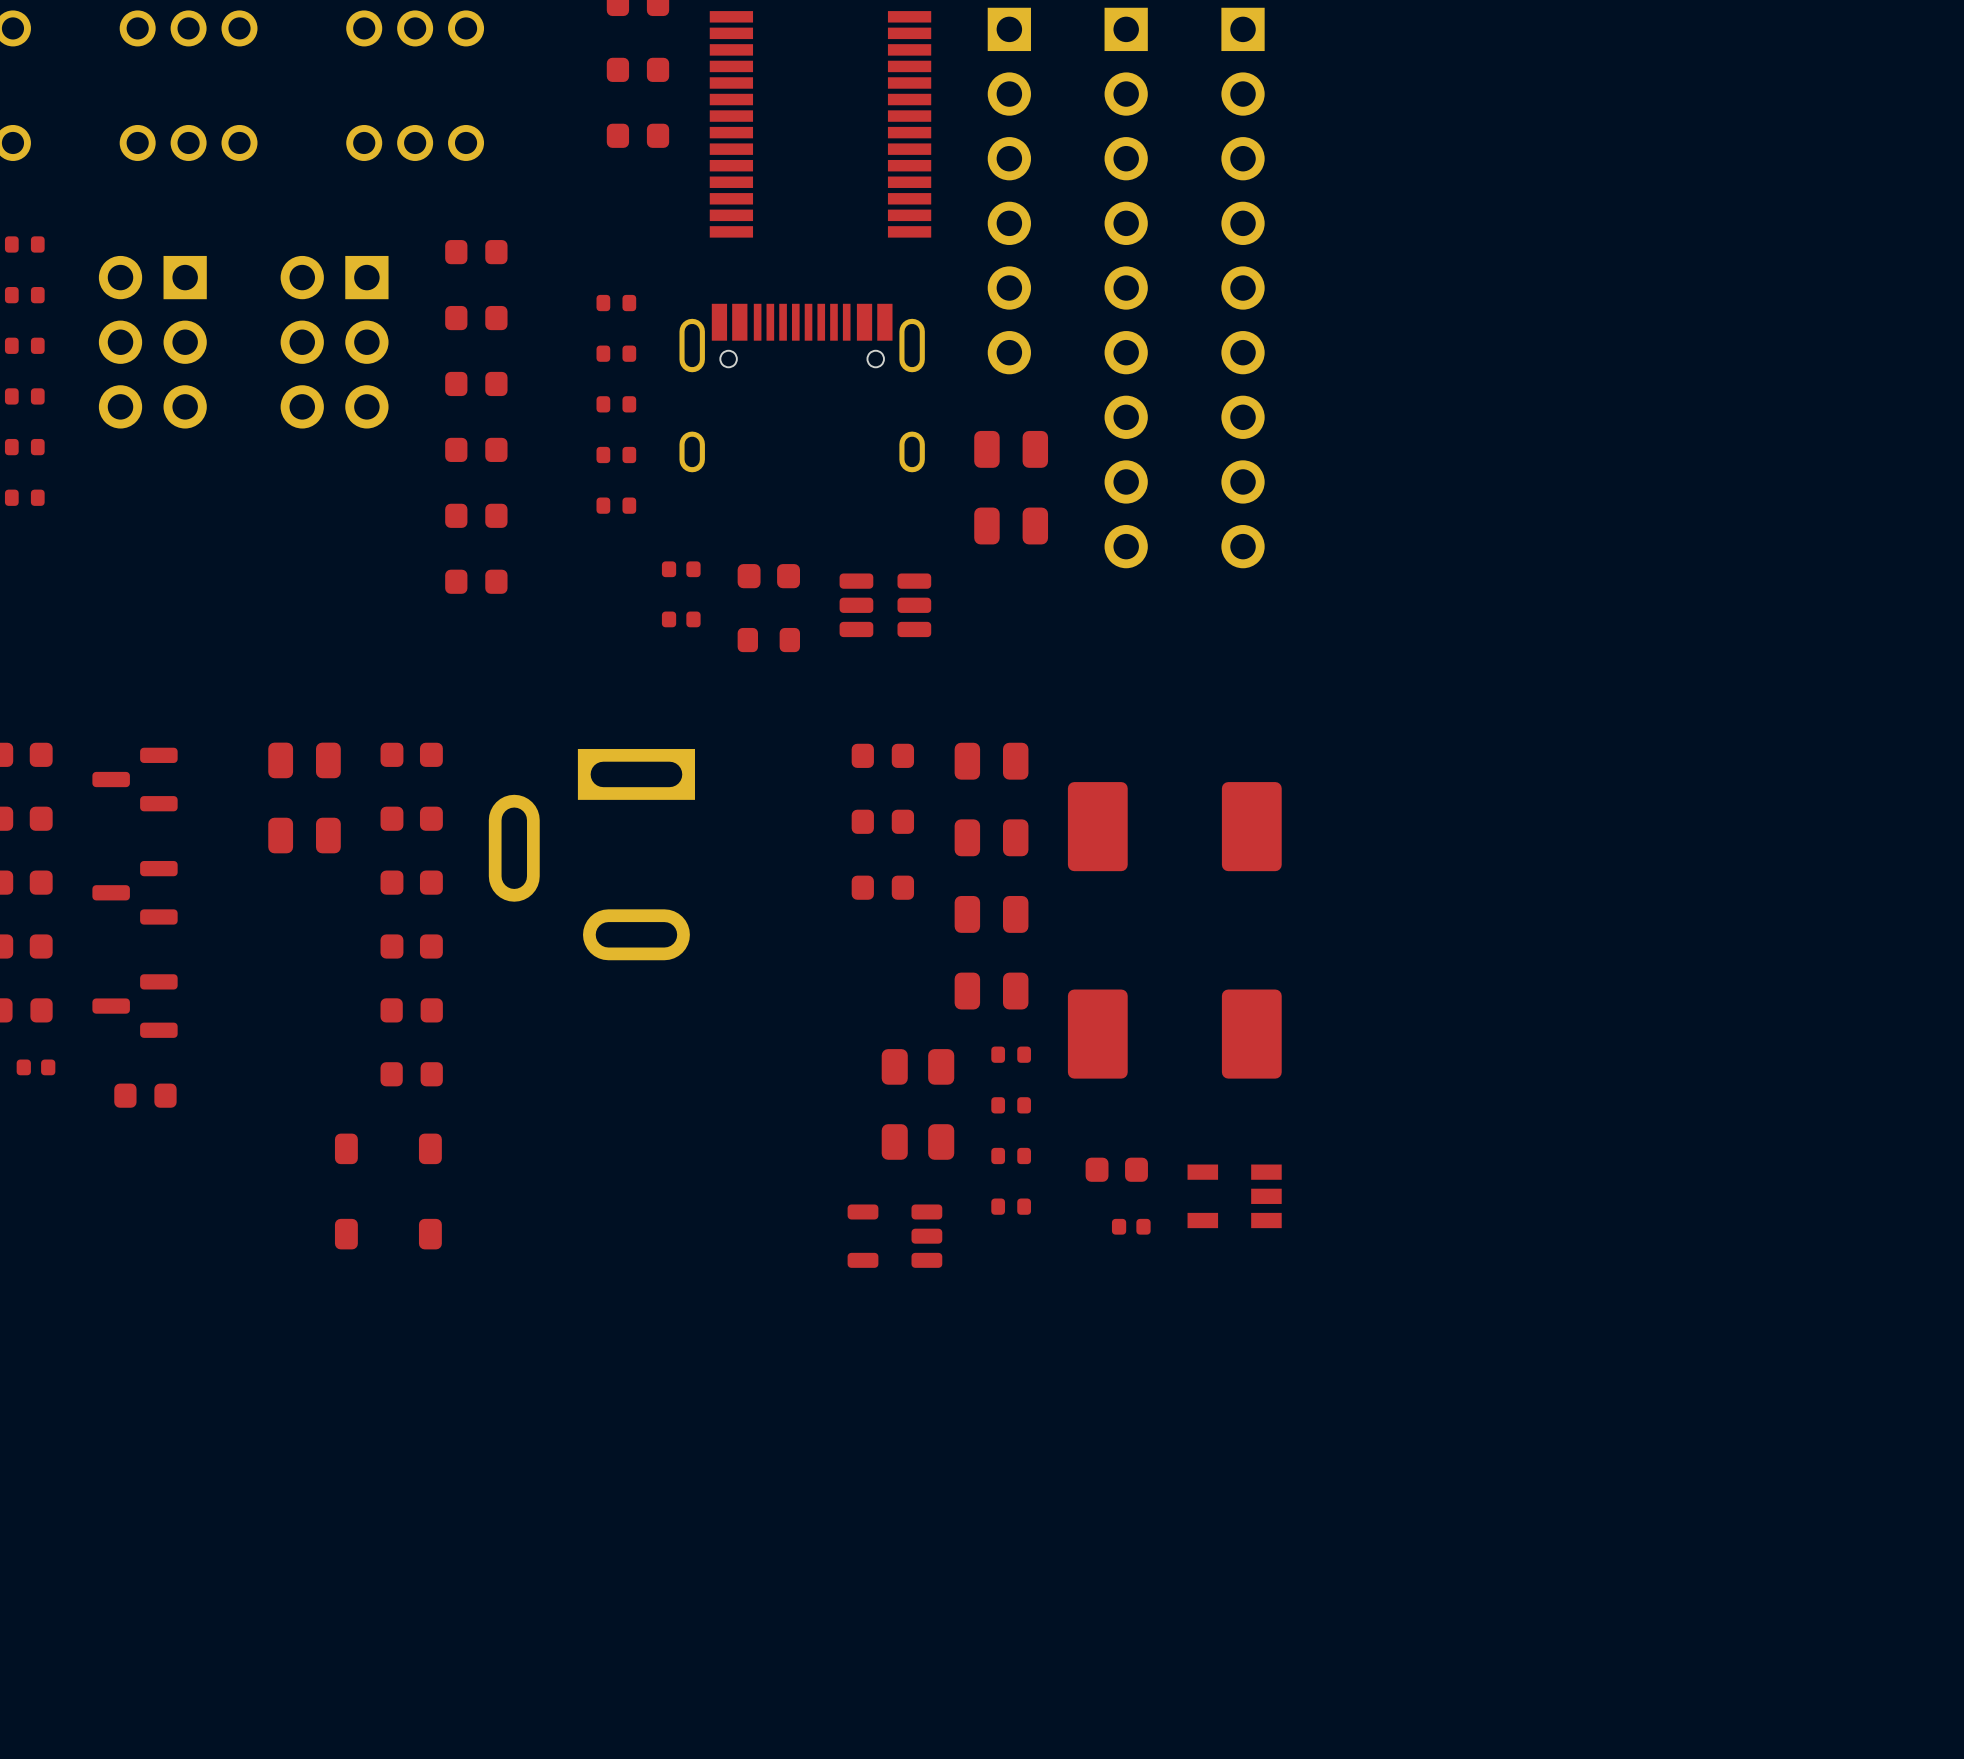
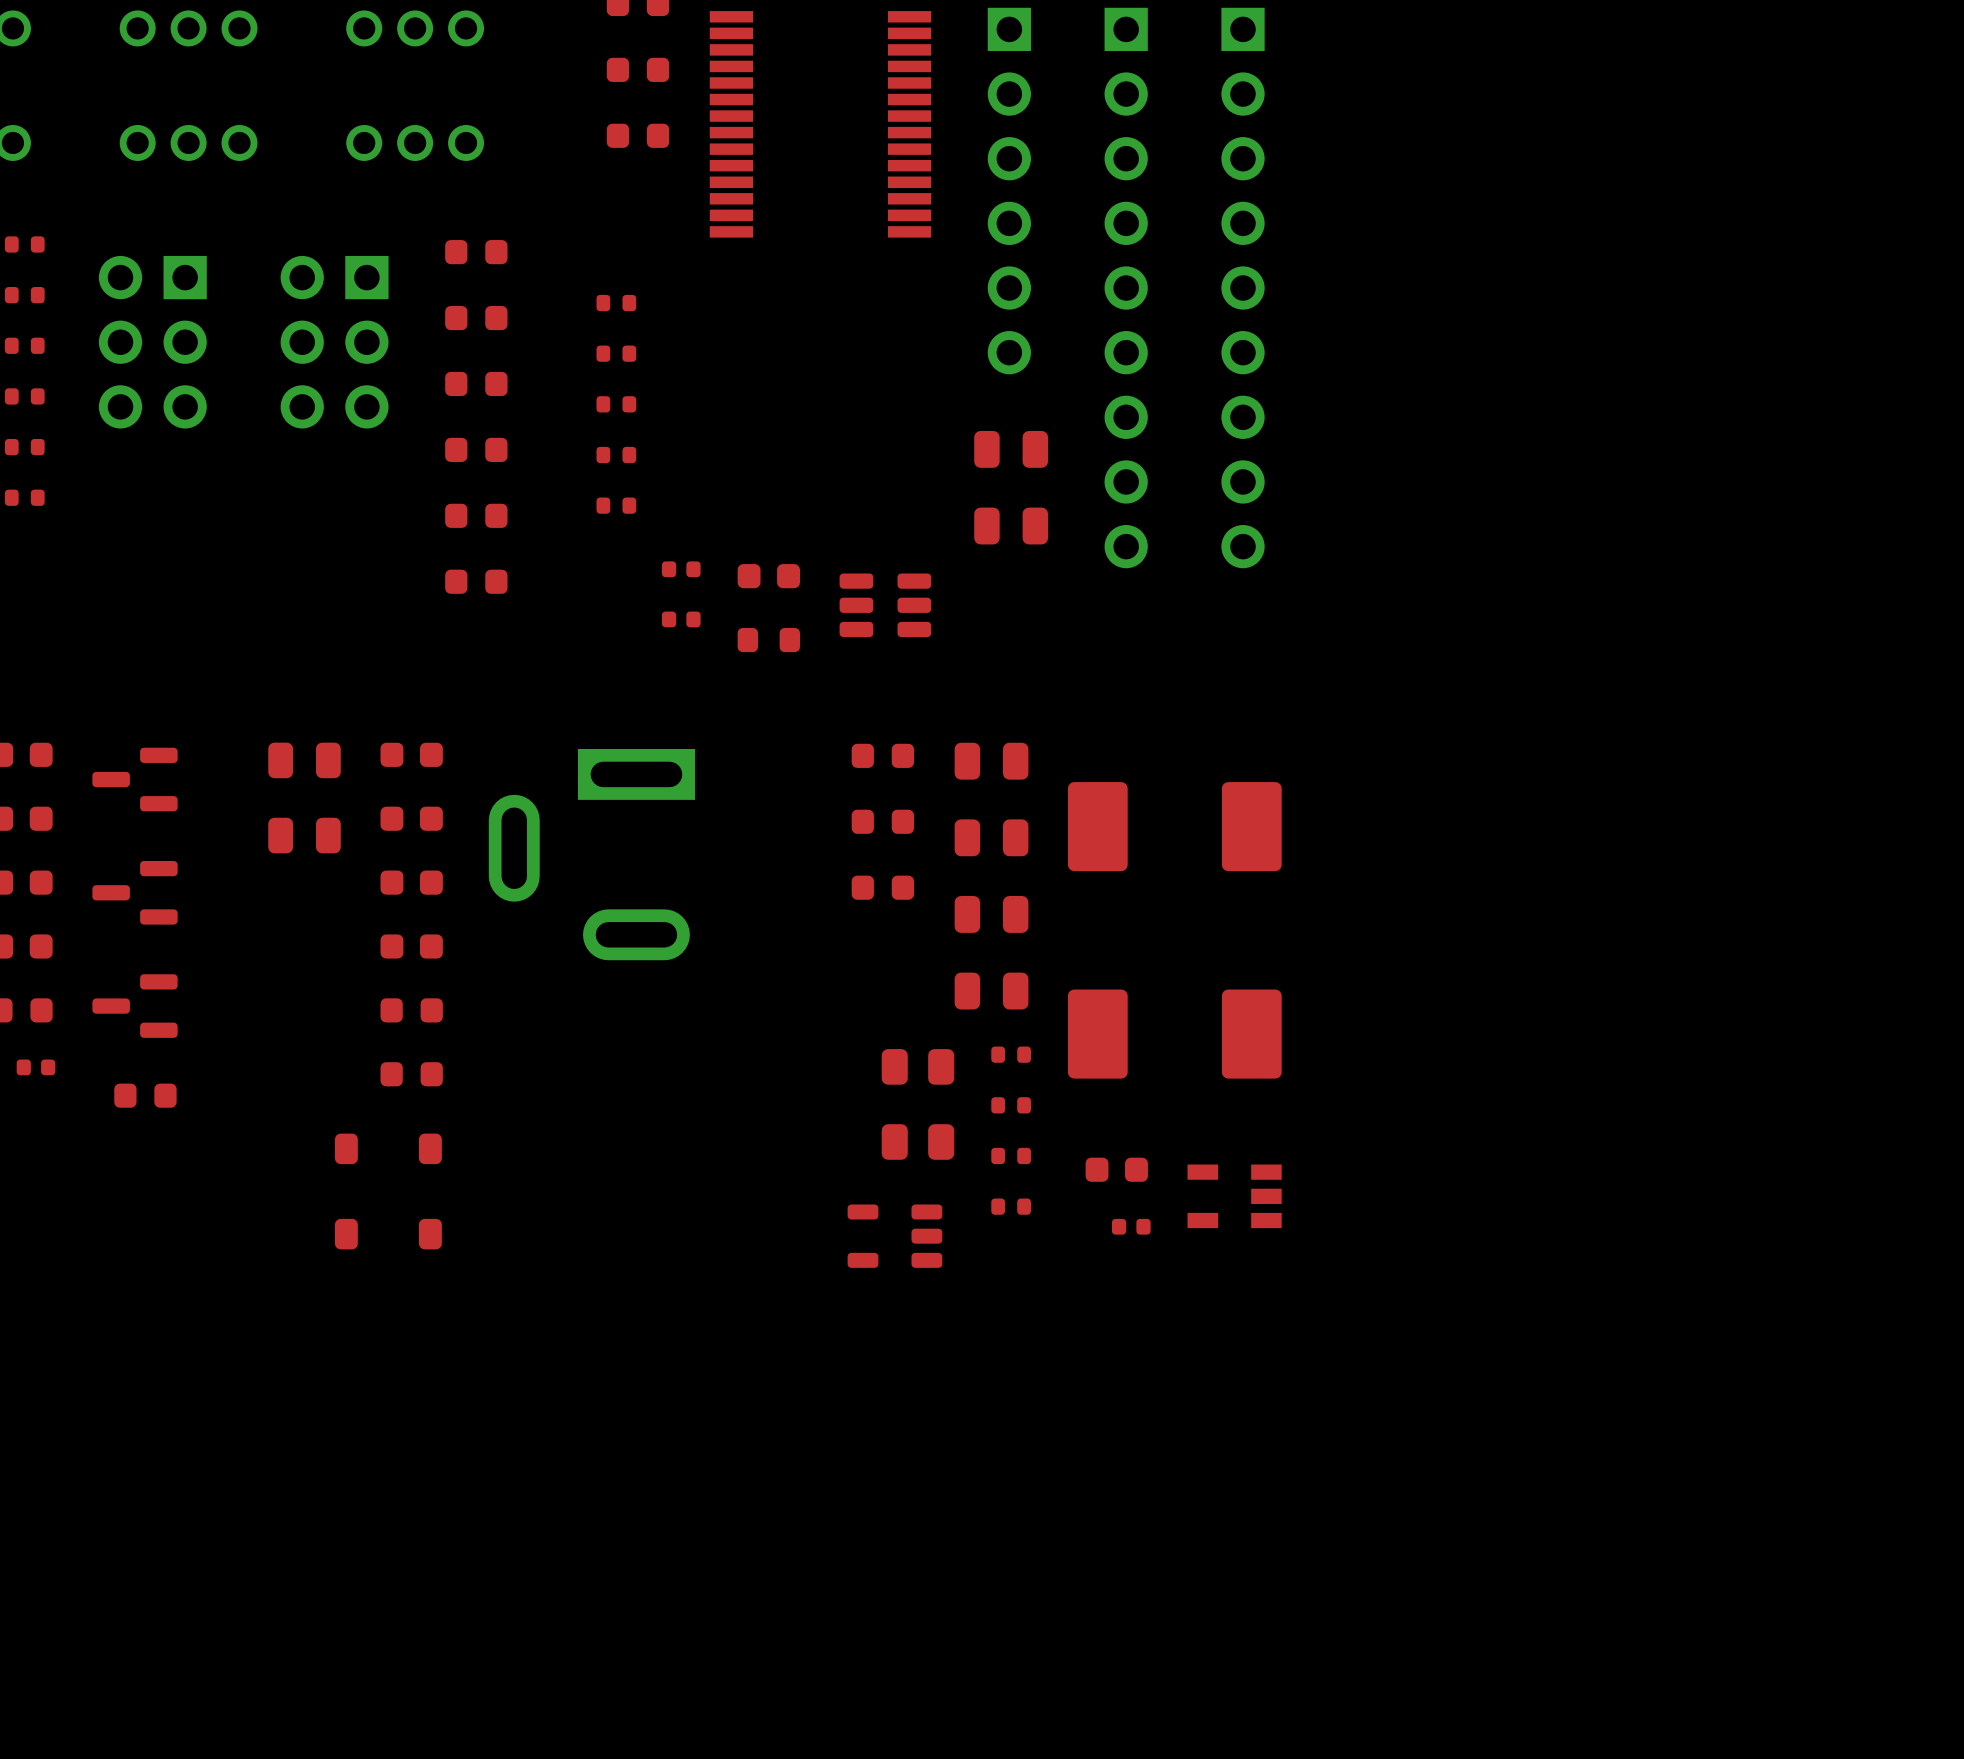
part: (802, 388) -> none

